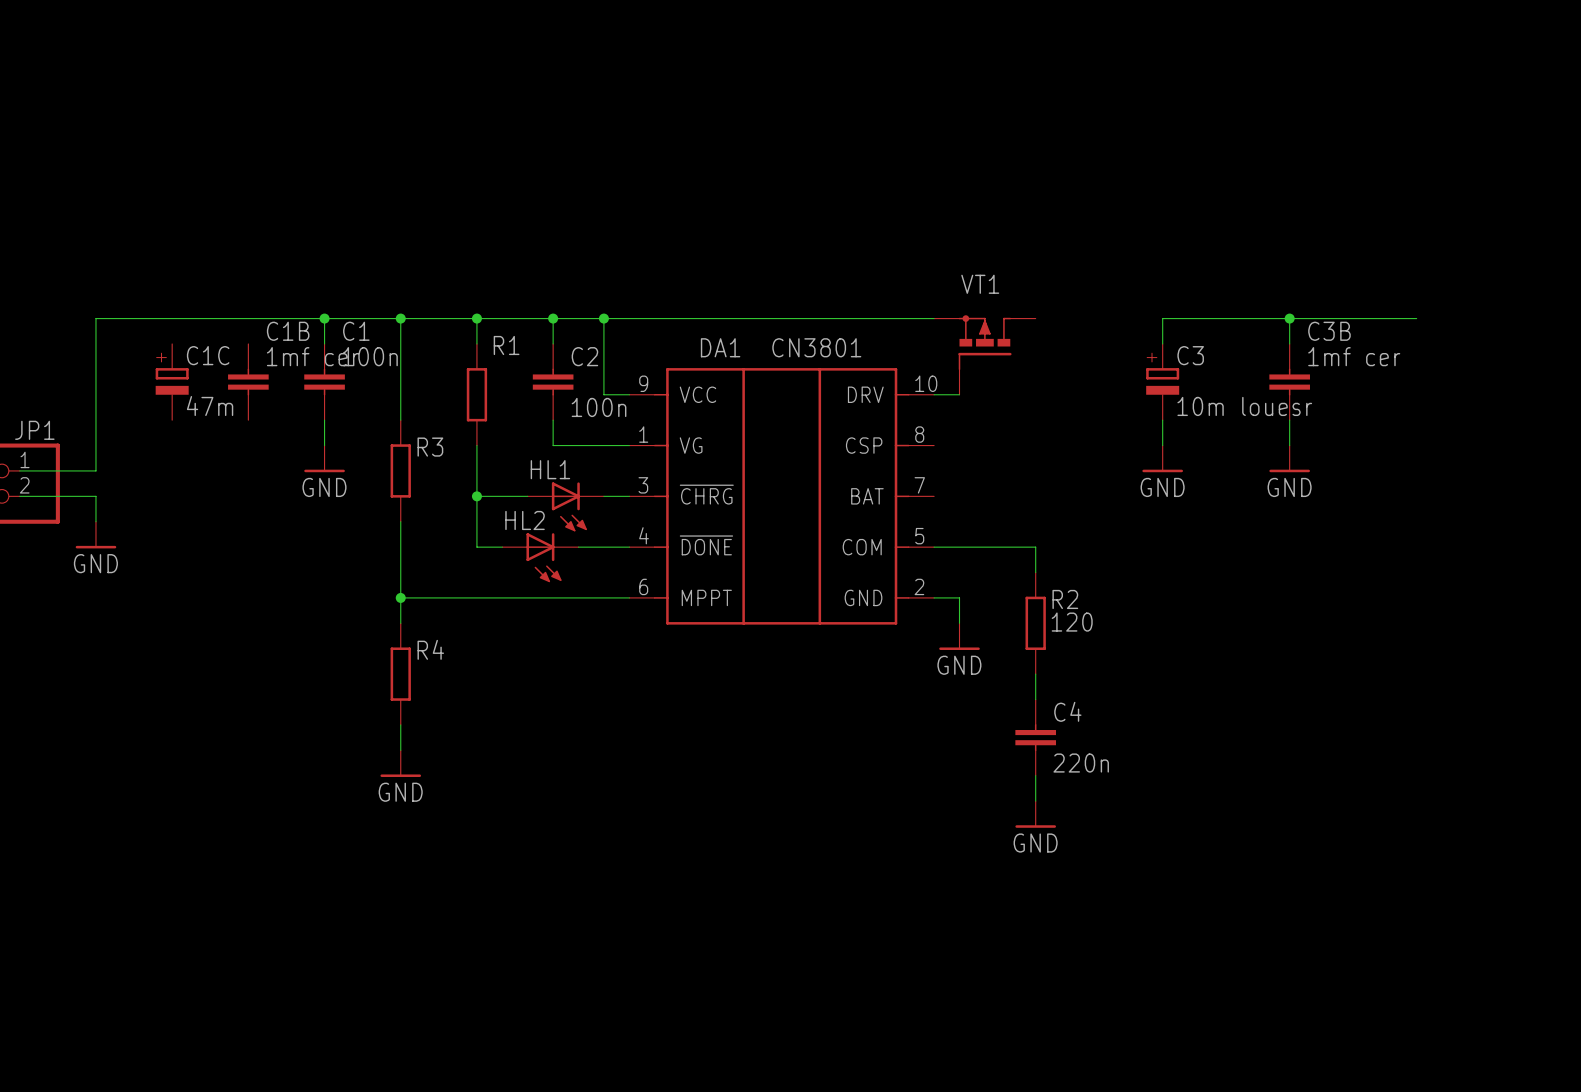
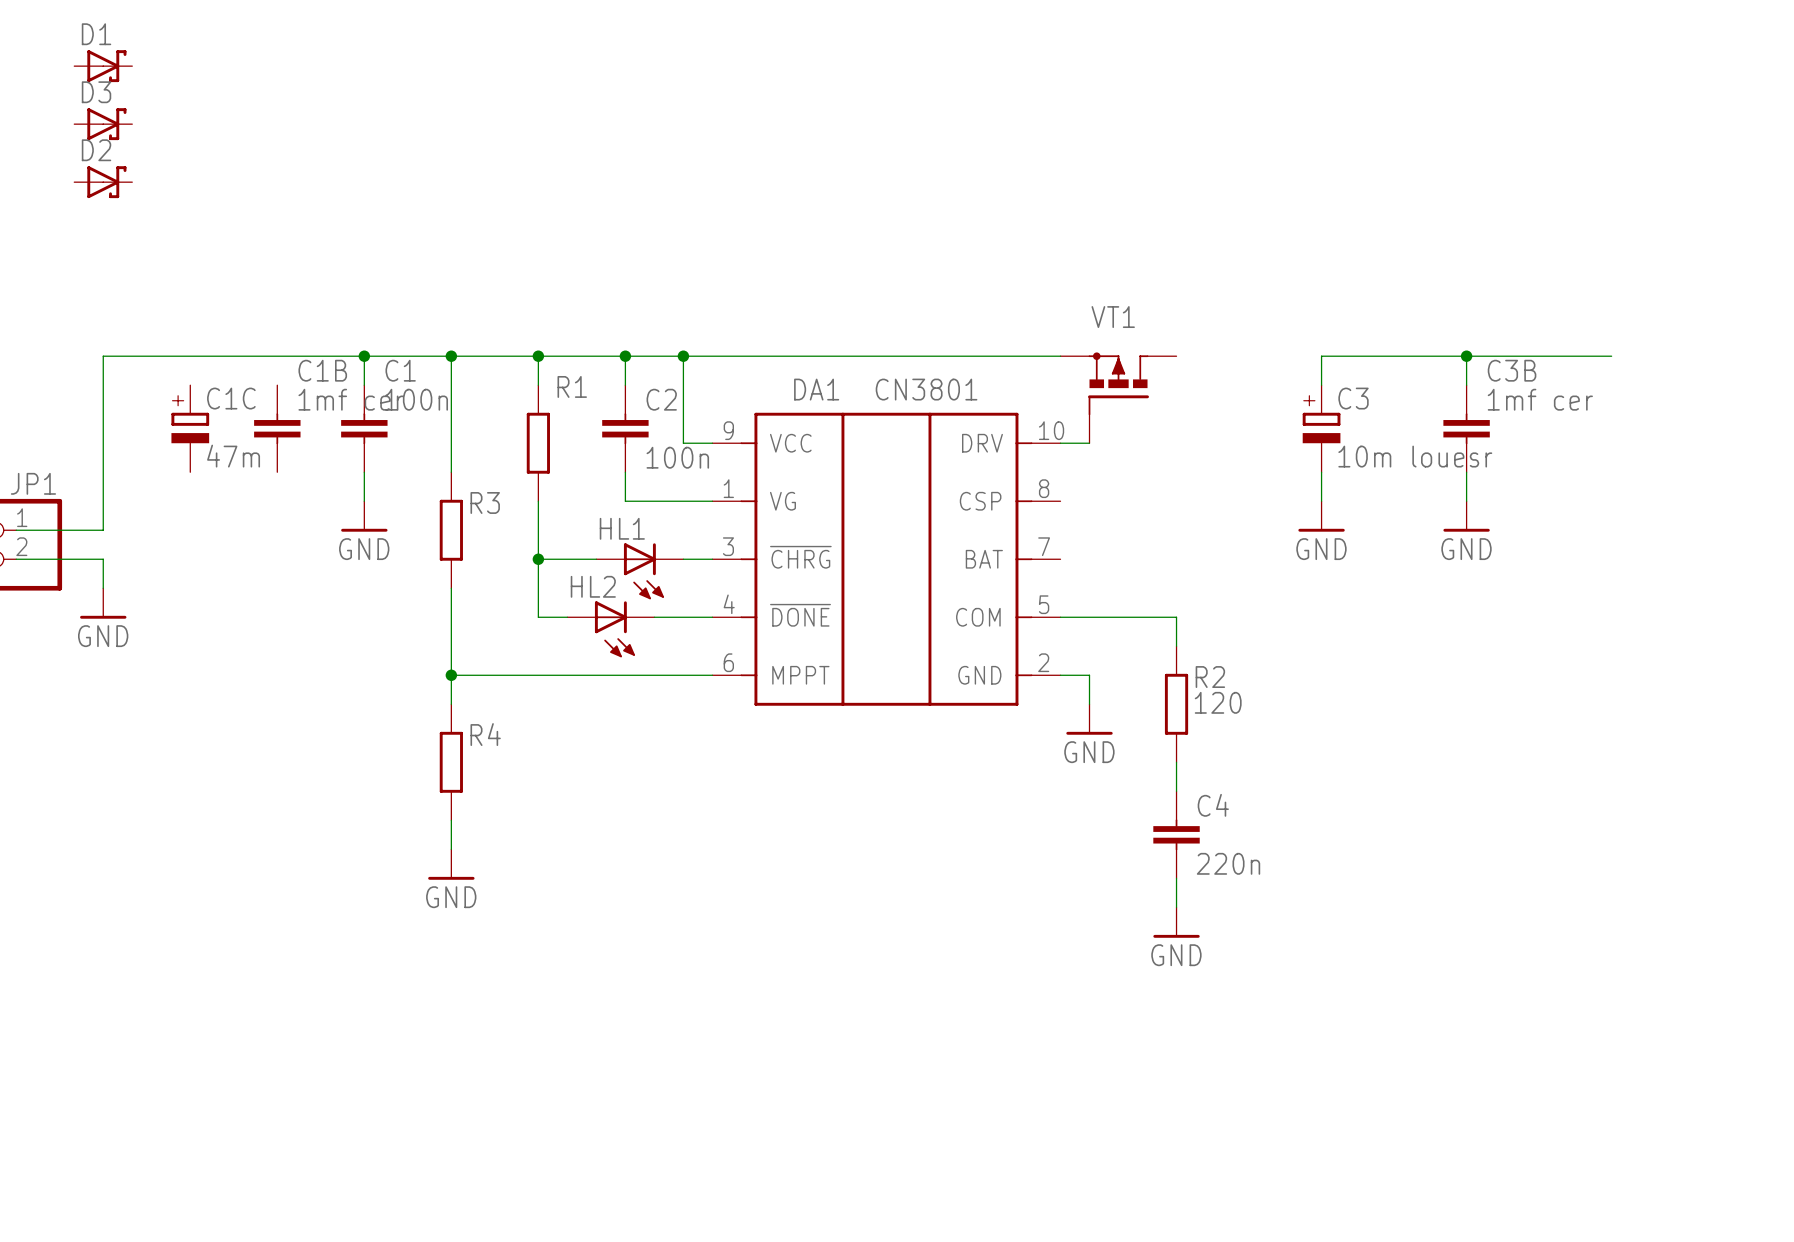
D1: none -> (103, 66)
D3: none -> (103, 124)
D2: none -> (103, 182)

